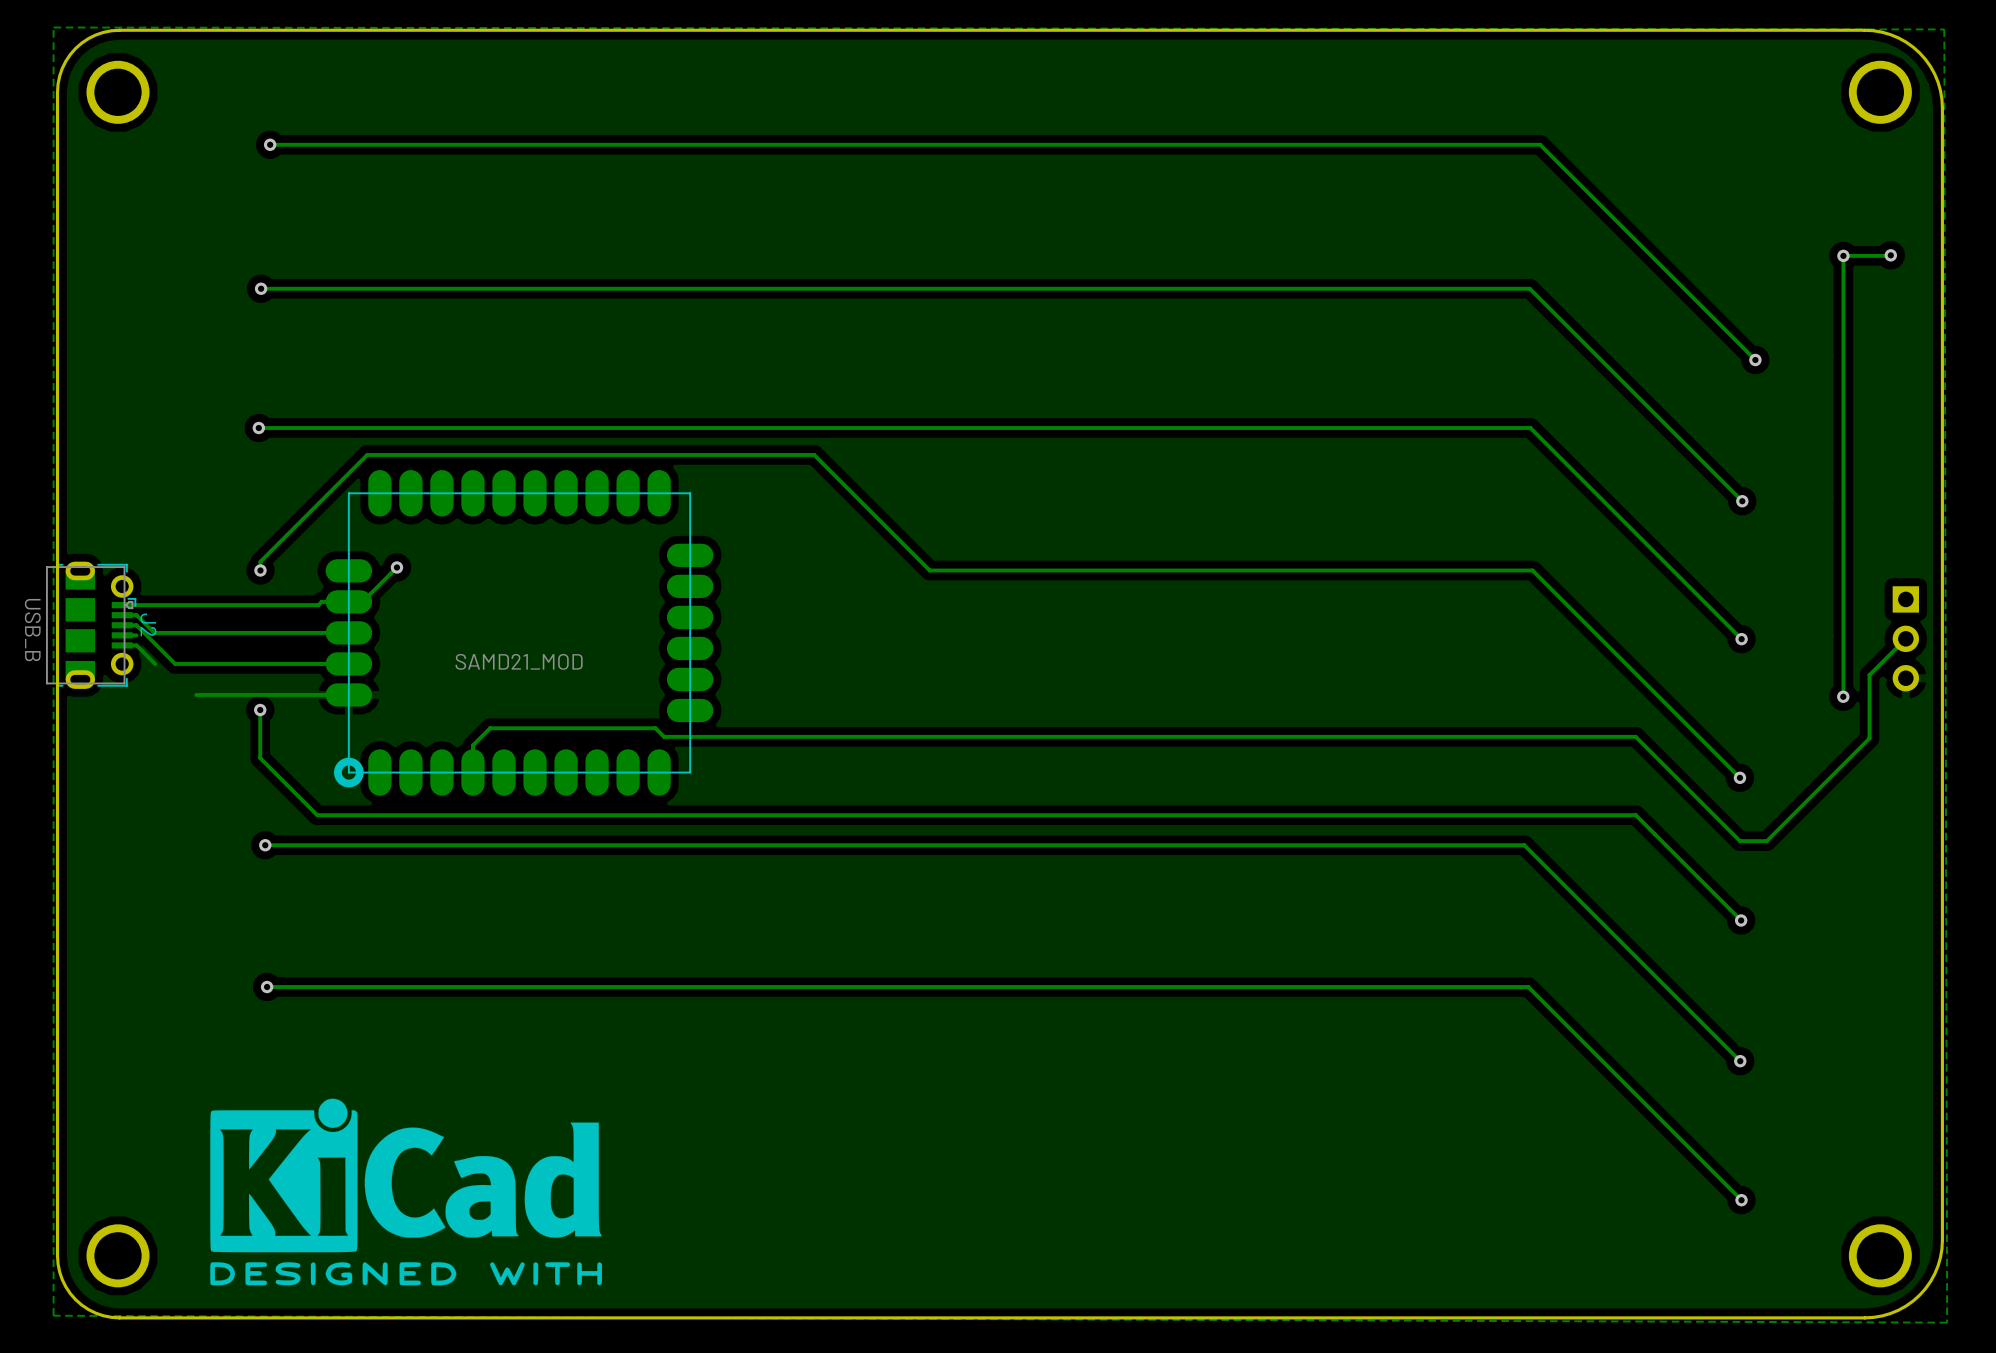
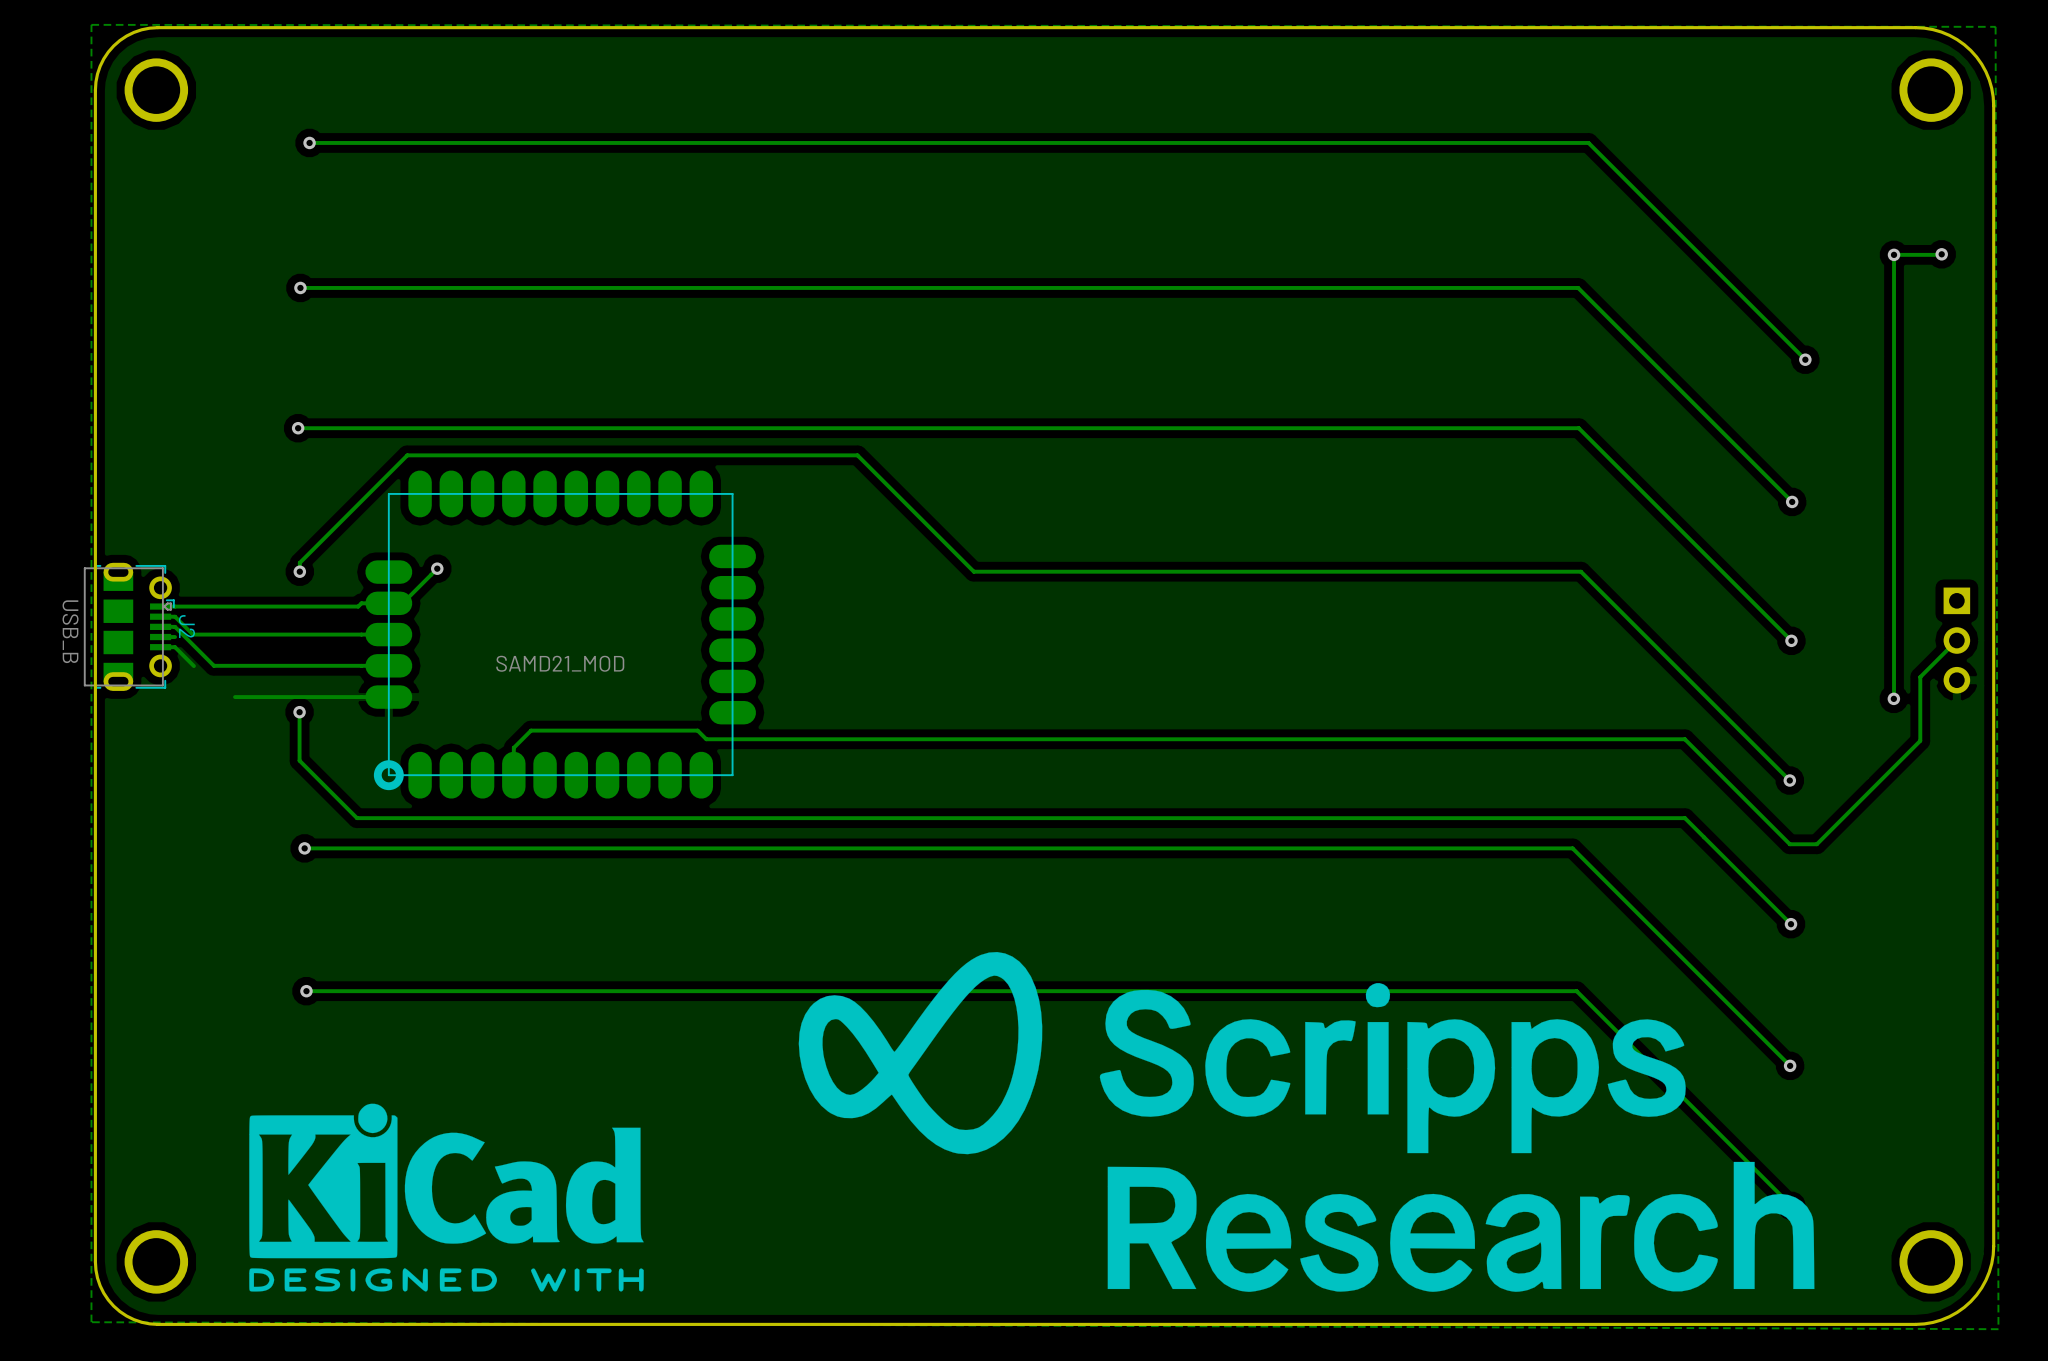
drawing: none -> [798, 952, 1815, 1292]

